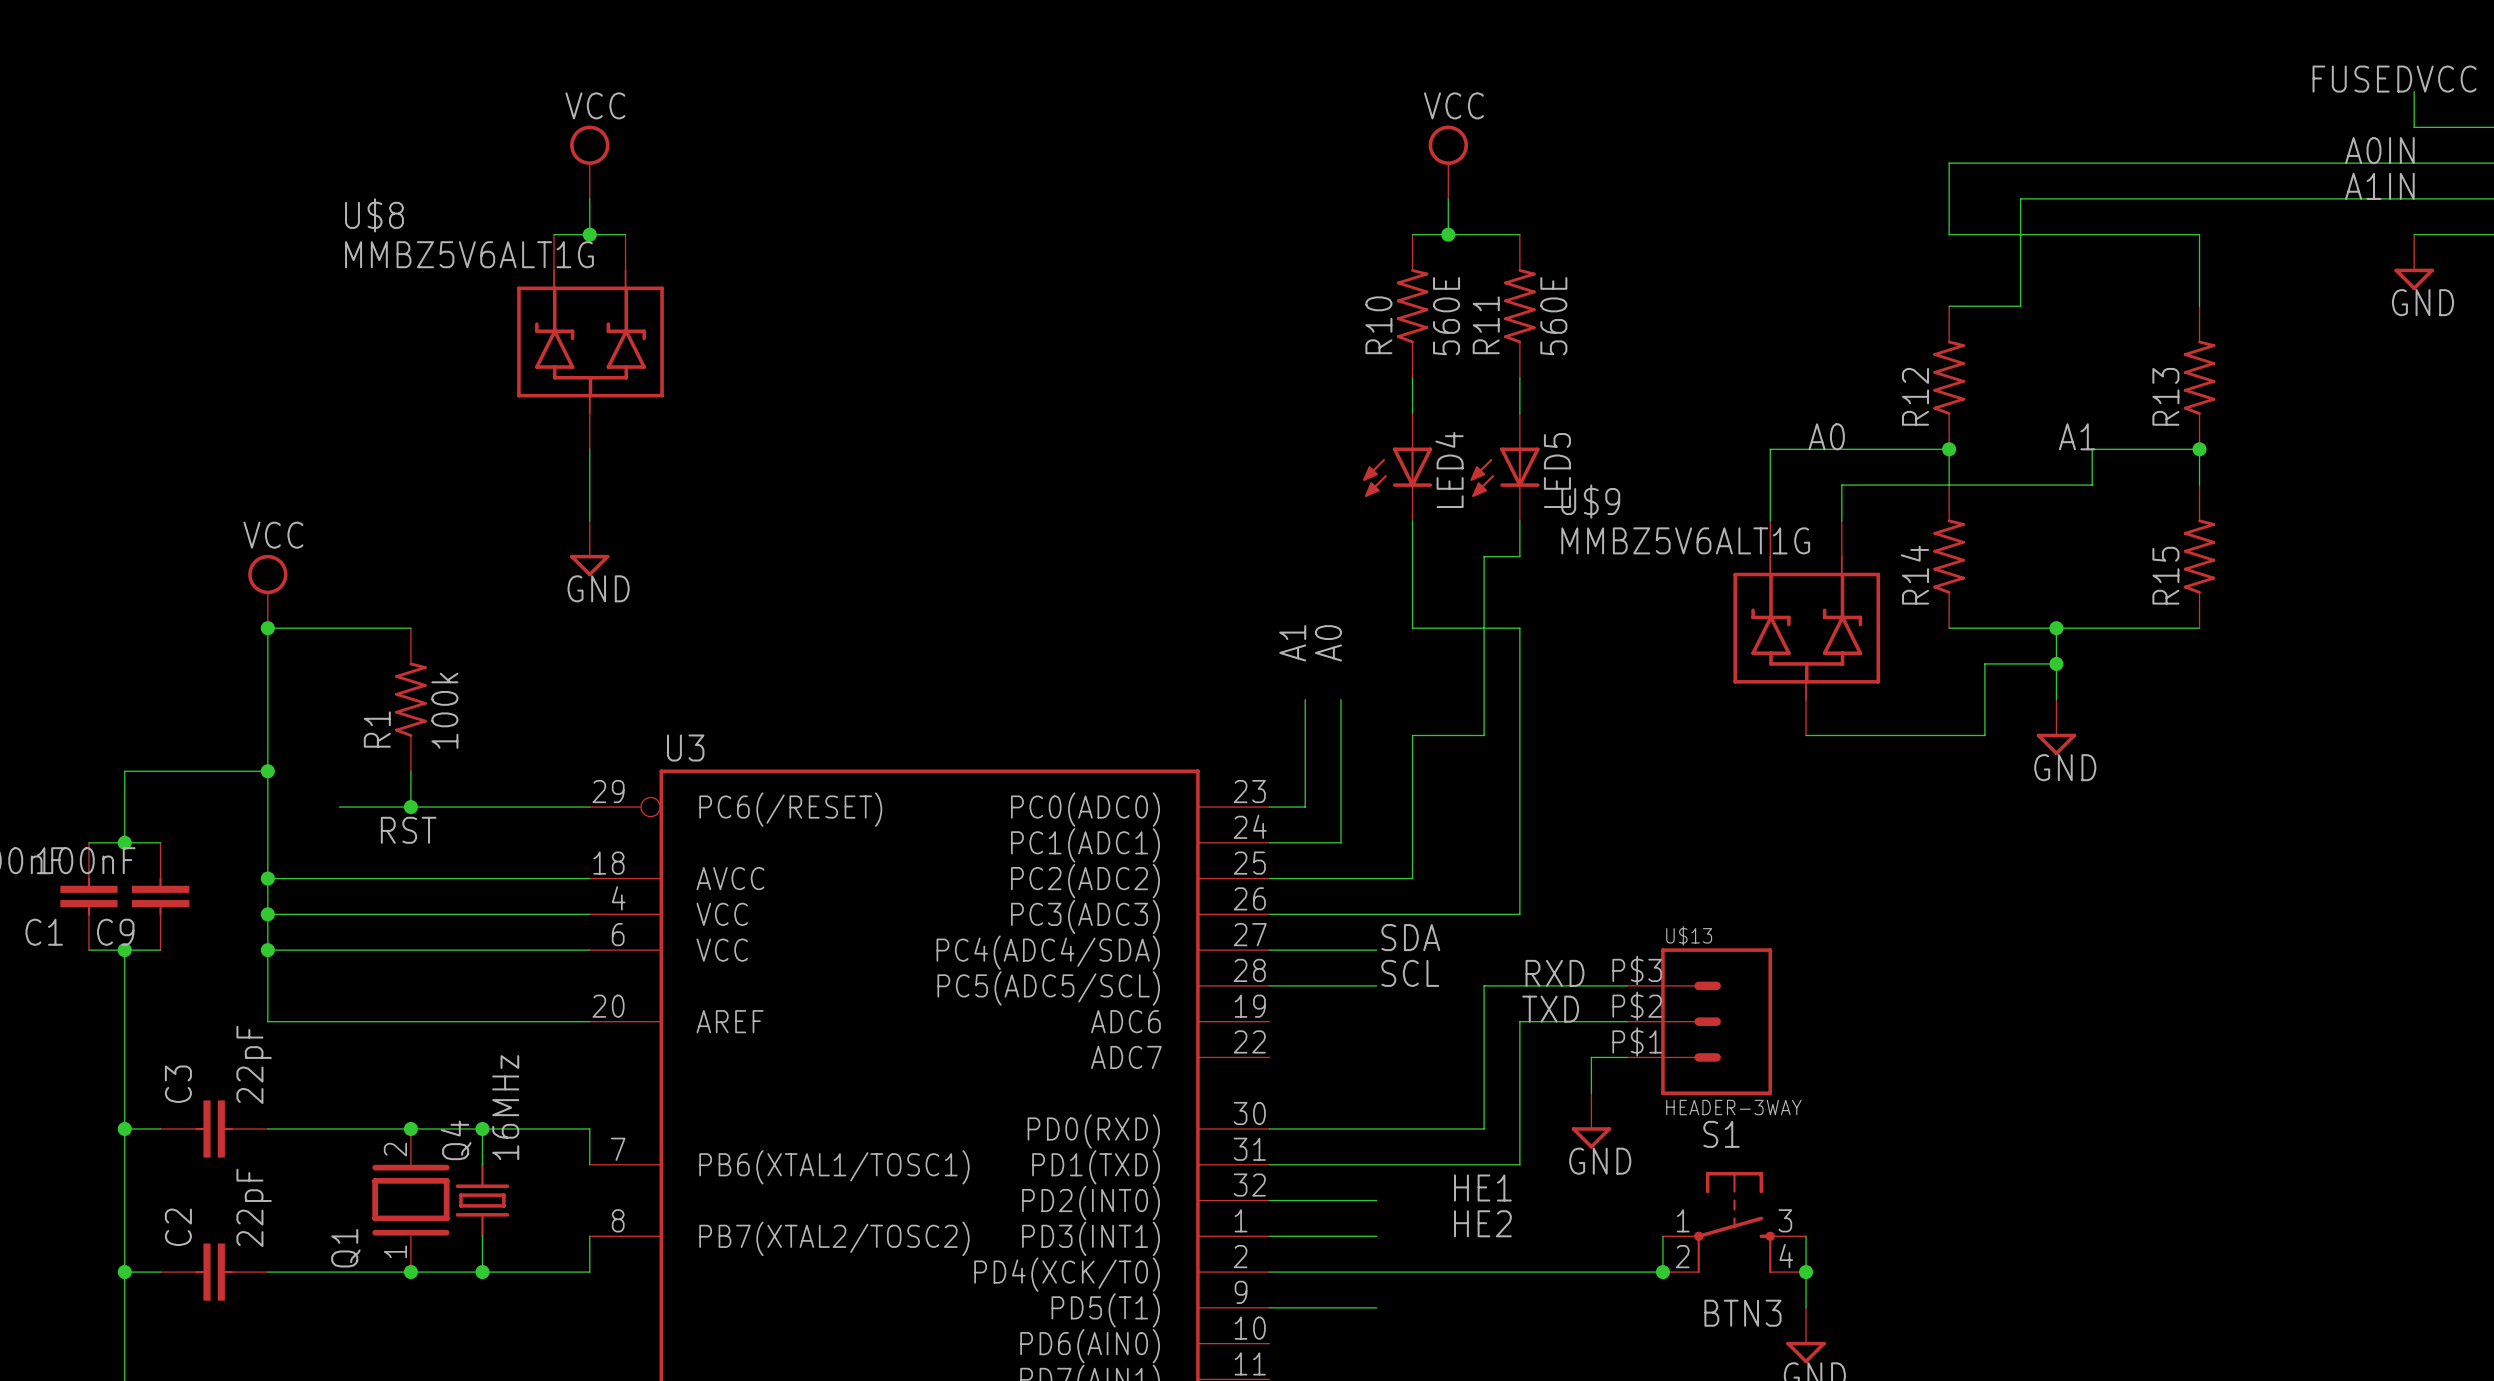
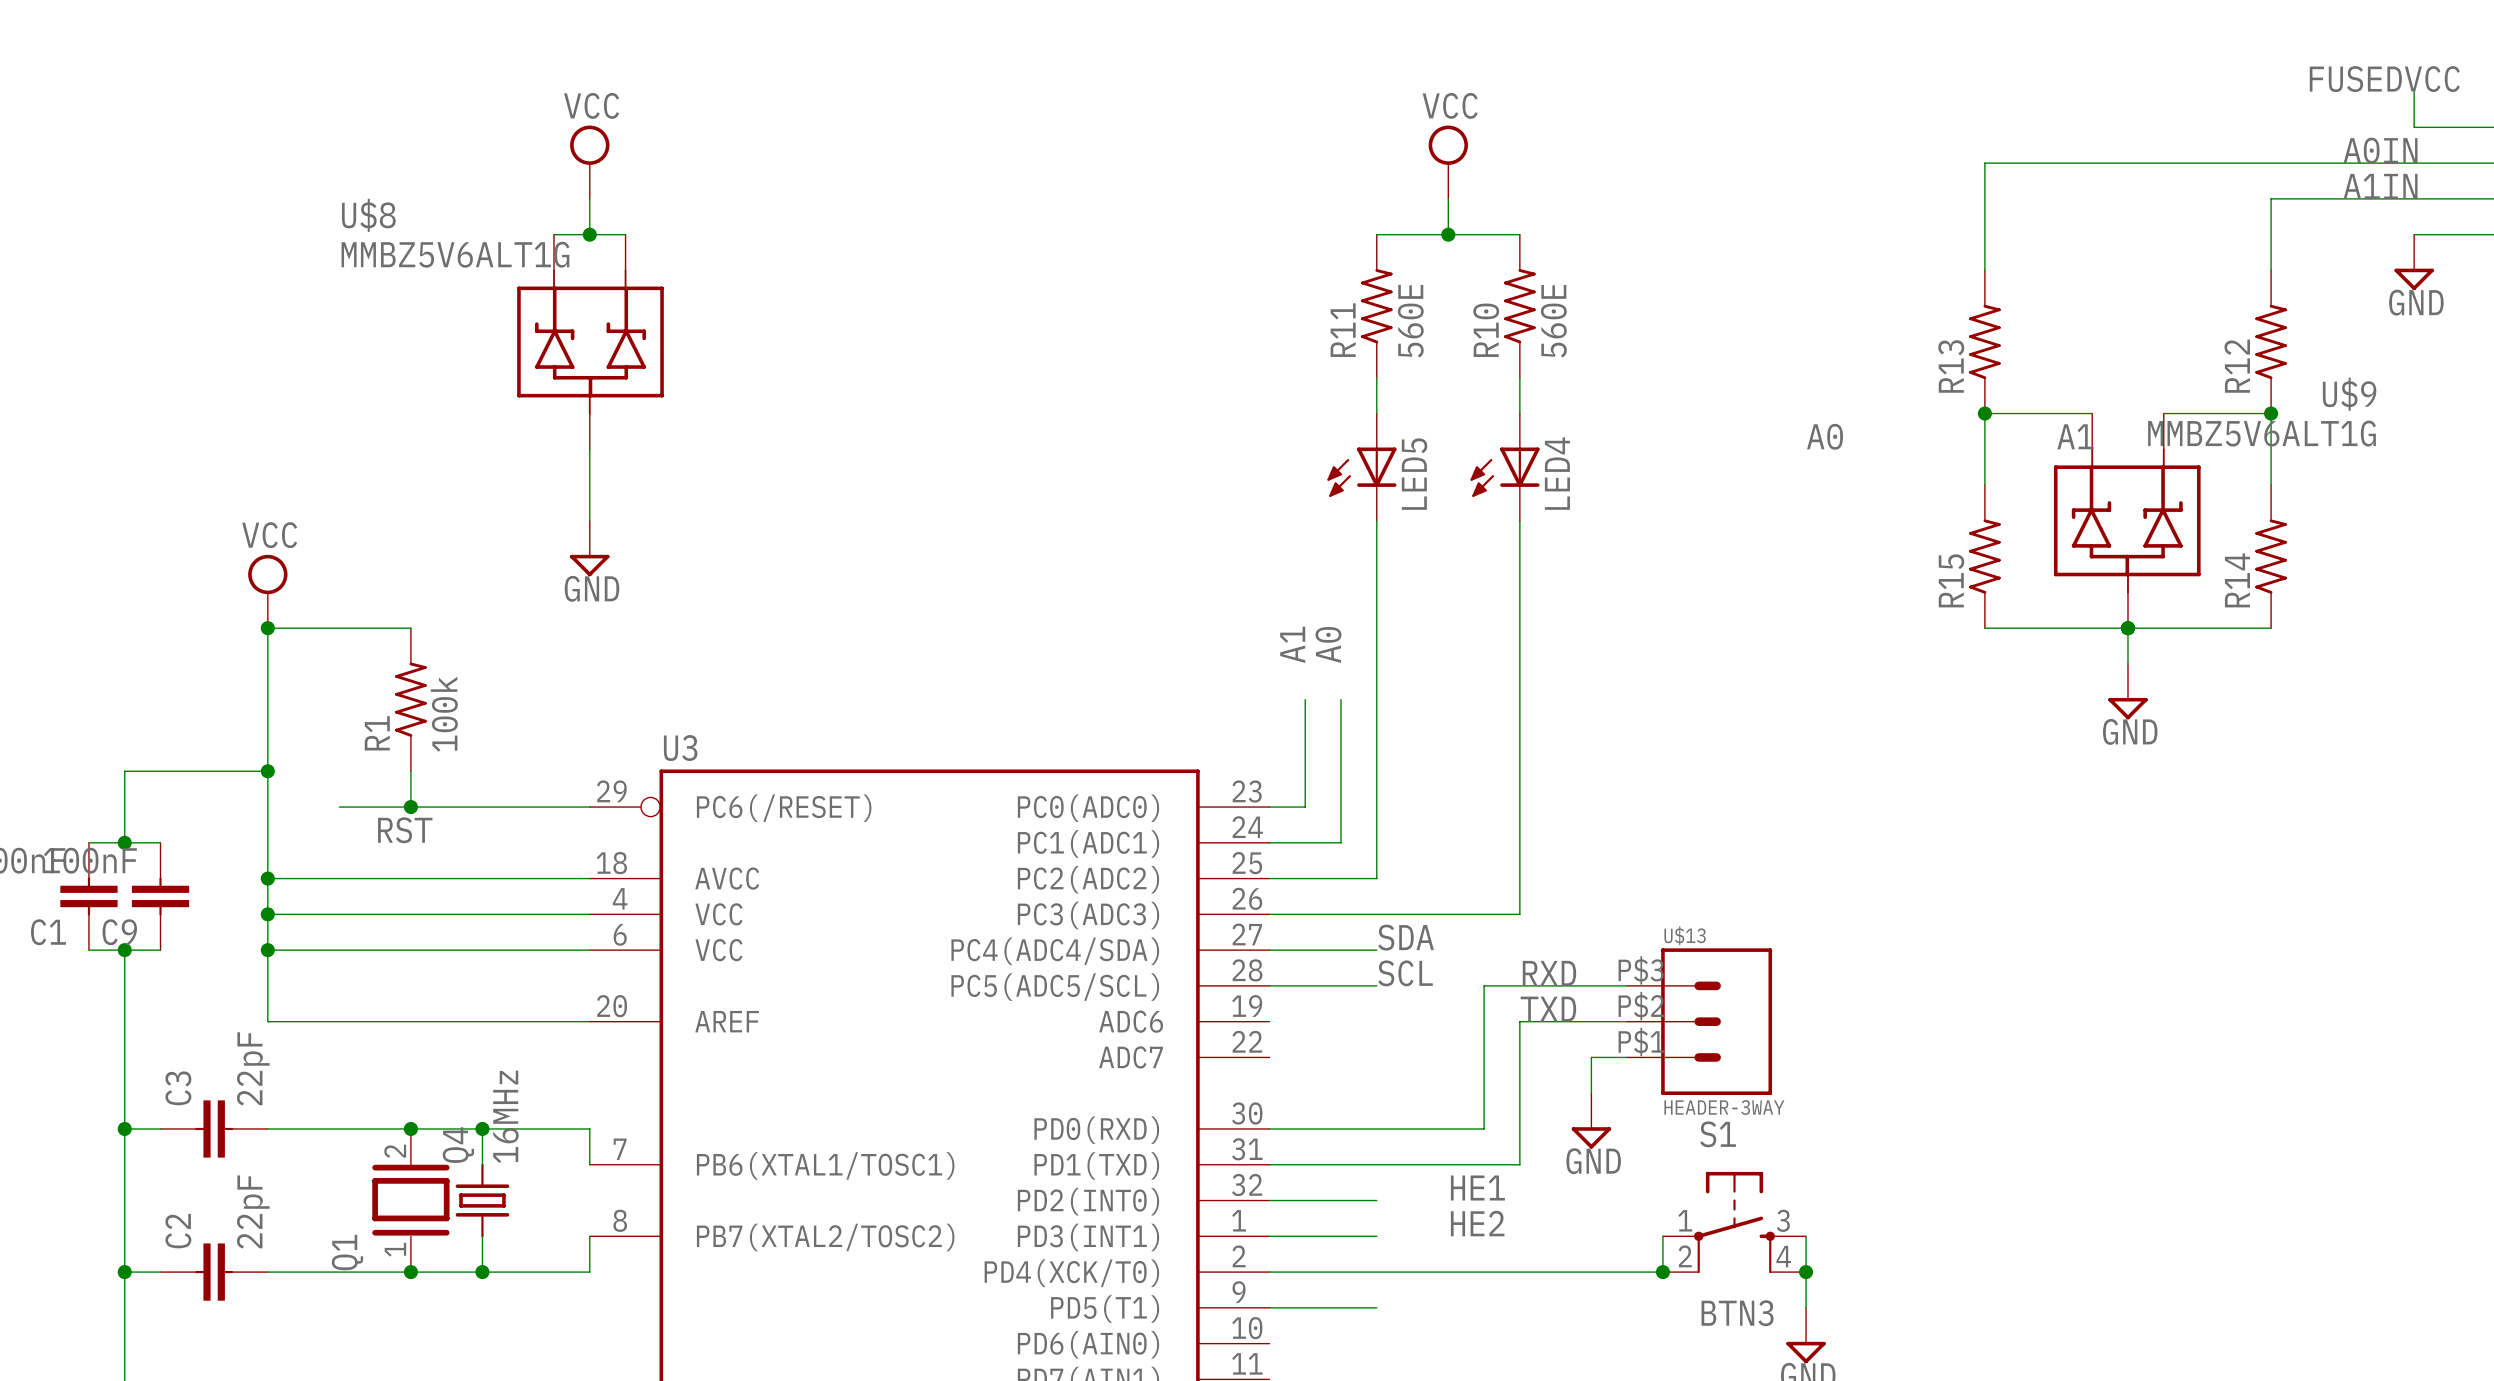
wire: (1984, 163) (1949, 163) (1949, 234) (2199, 234) (2199, 306) -> (1984, 163) (1984, 270)
wire: (2271, 198) (2020, 198) (2020, 306) (1949, 306) -> (2271, 198) (2271, 270)
wire: none -> (1376, 234) (1412, 234)
R11: none -> 560E (1376, 306)
R10: 560E (1412, 306) -> none
R11 name: R11 (1486, 325) -> R10 (1486, 330)
wire: (1412, 377) (1412, 413) -> (1376, 377) (1376, 413)
R12 position: (1949, 377) -> (2271, 341)
R13 position: (2199, 377) -> (1984, 341)
wire: none -> (2092, 413) (1984, 413) (1984, 485)
wire: none -> (2163, 413) (2271, 413) (2271, 485)
junction position: (1949, 449) -> (1984, 413)
junction position: (2199, 449) -> (2271, 413)
LED5: none -> (1361, 467)
LED4: (1397, 467) -> none
LED5 name: LED5 (1557, 470) -> LED4 (1557, 473)
wire: (1949, 485) (1949, 449) (1770, 449) (1770, 520) -> none
wire: (2199, 485) (2199, 449) (2092, 449) (2092, 485) (1841, 485) (1841, 520) -> none
wire: (1412, 520) (1412, 628) (1519, 628) -> (1519, 556) (1519, 628)
wire: (1519, 556) (1484, 556) (1484, 735) (1412, 735) (1412, 878) (1376, 878) -> (1376, 520) (1376, 878)
R14 position: (1949, 556) -> (2271, 556)
R15 position: (2199, 556) -> (1984, 556)
U$9 flip: as is (1806, 628) -> left-right (2127, 520)
U$9 position: (1806, 628) -> (2127, 520)
wire: (1949, 628) (1984, 628) -> none
wire: (2056, 628) (2056, 699) -> none
junction: (2056, 628) -> none
wire: none -> (2127, 628) (2127, 663)
junction: none -> (2127, 628)
wire: none -> (2199, 628) (2271, 628)
wire: (2056, 663) (1984, 663) (1984, 735) (1806, 735) -> none
junction: (2056, 663) -> none
power symbol position: GND (2056, 727) -> GND (2127, 691)

